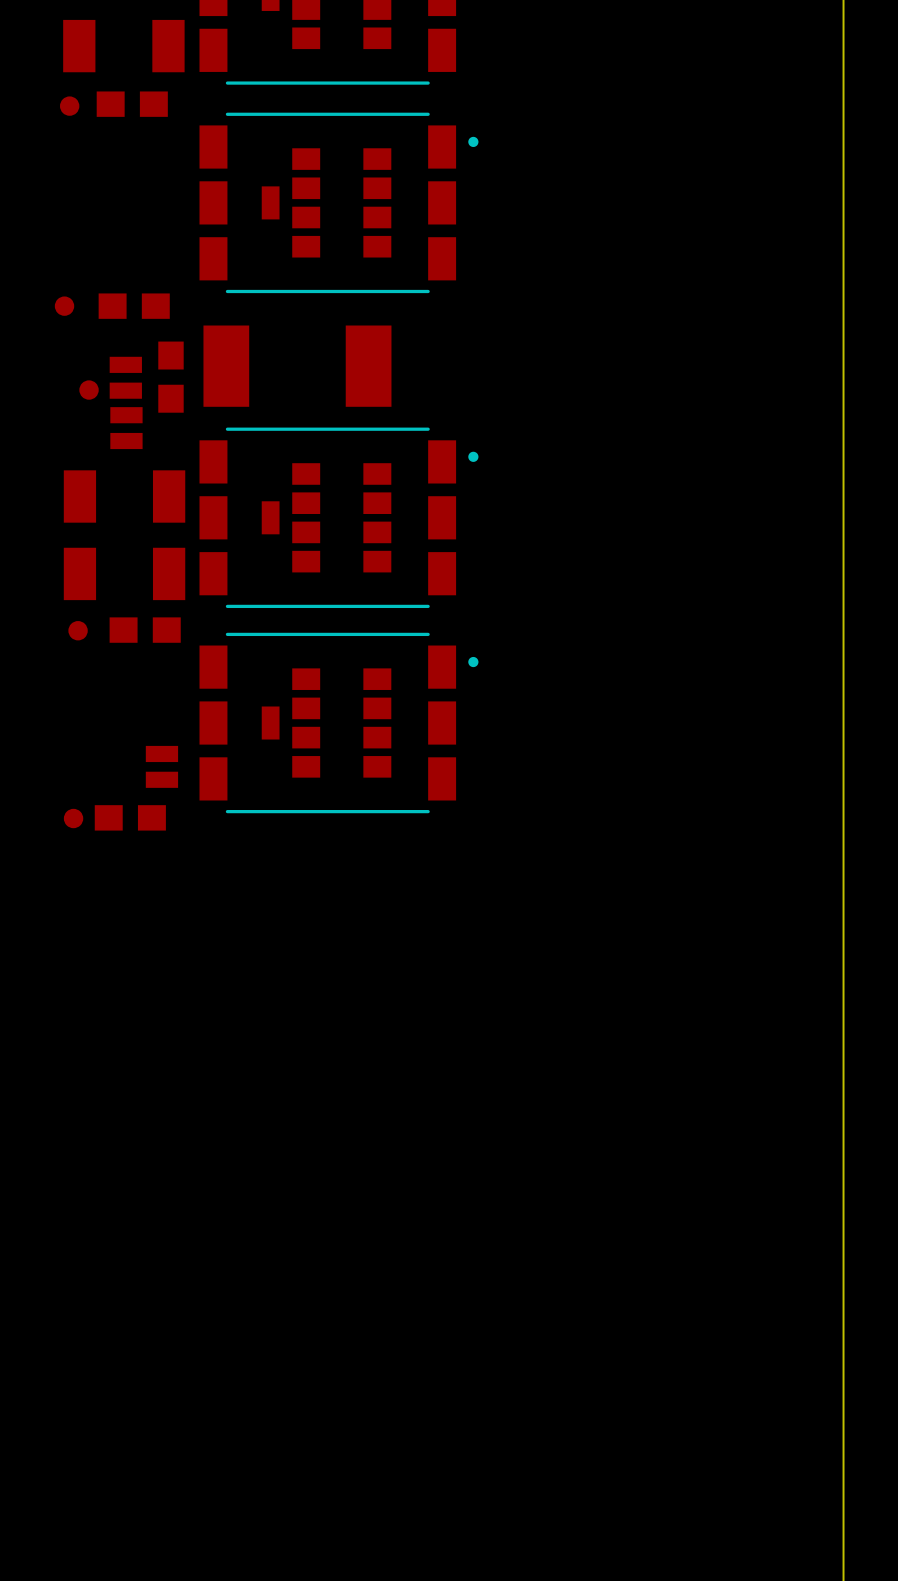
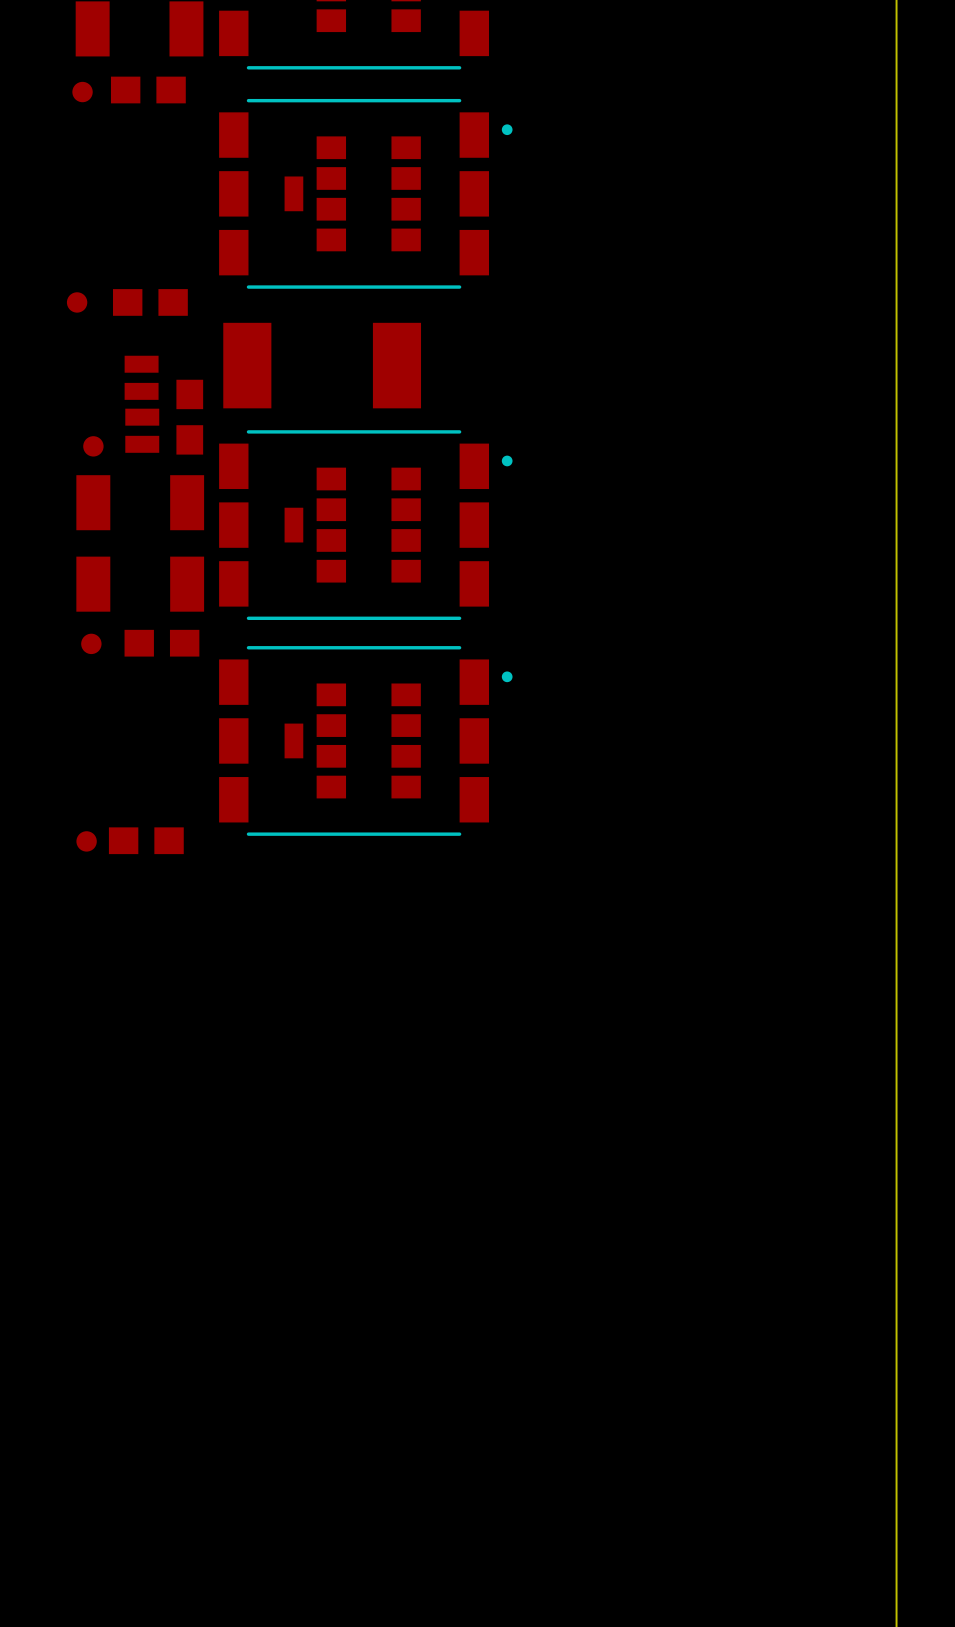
part position: (170, 377) -> (189, 417)
part position: (89, 390) -> (93, 446)
part: (161, 766) -> none

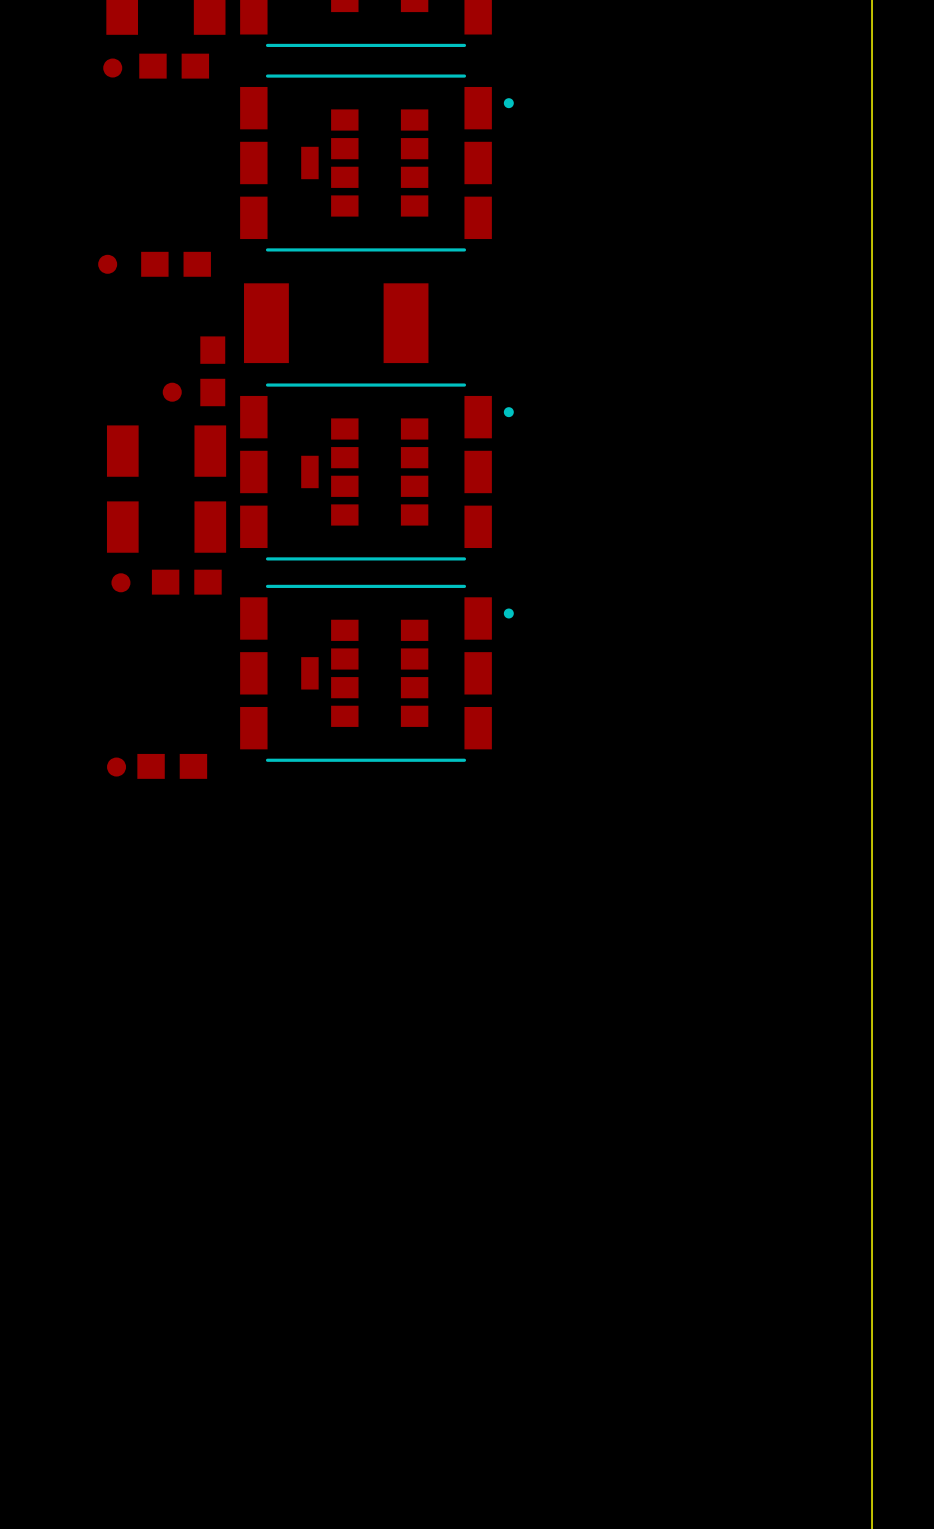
part: (141, 377) -> none
part footprint: [125, 408, 160, 453] -> [162, 382, 182, 402]
part: (93, 446) -> none

